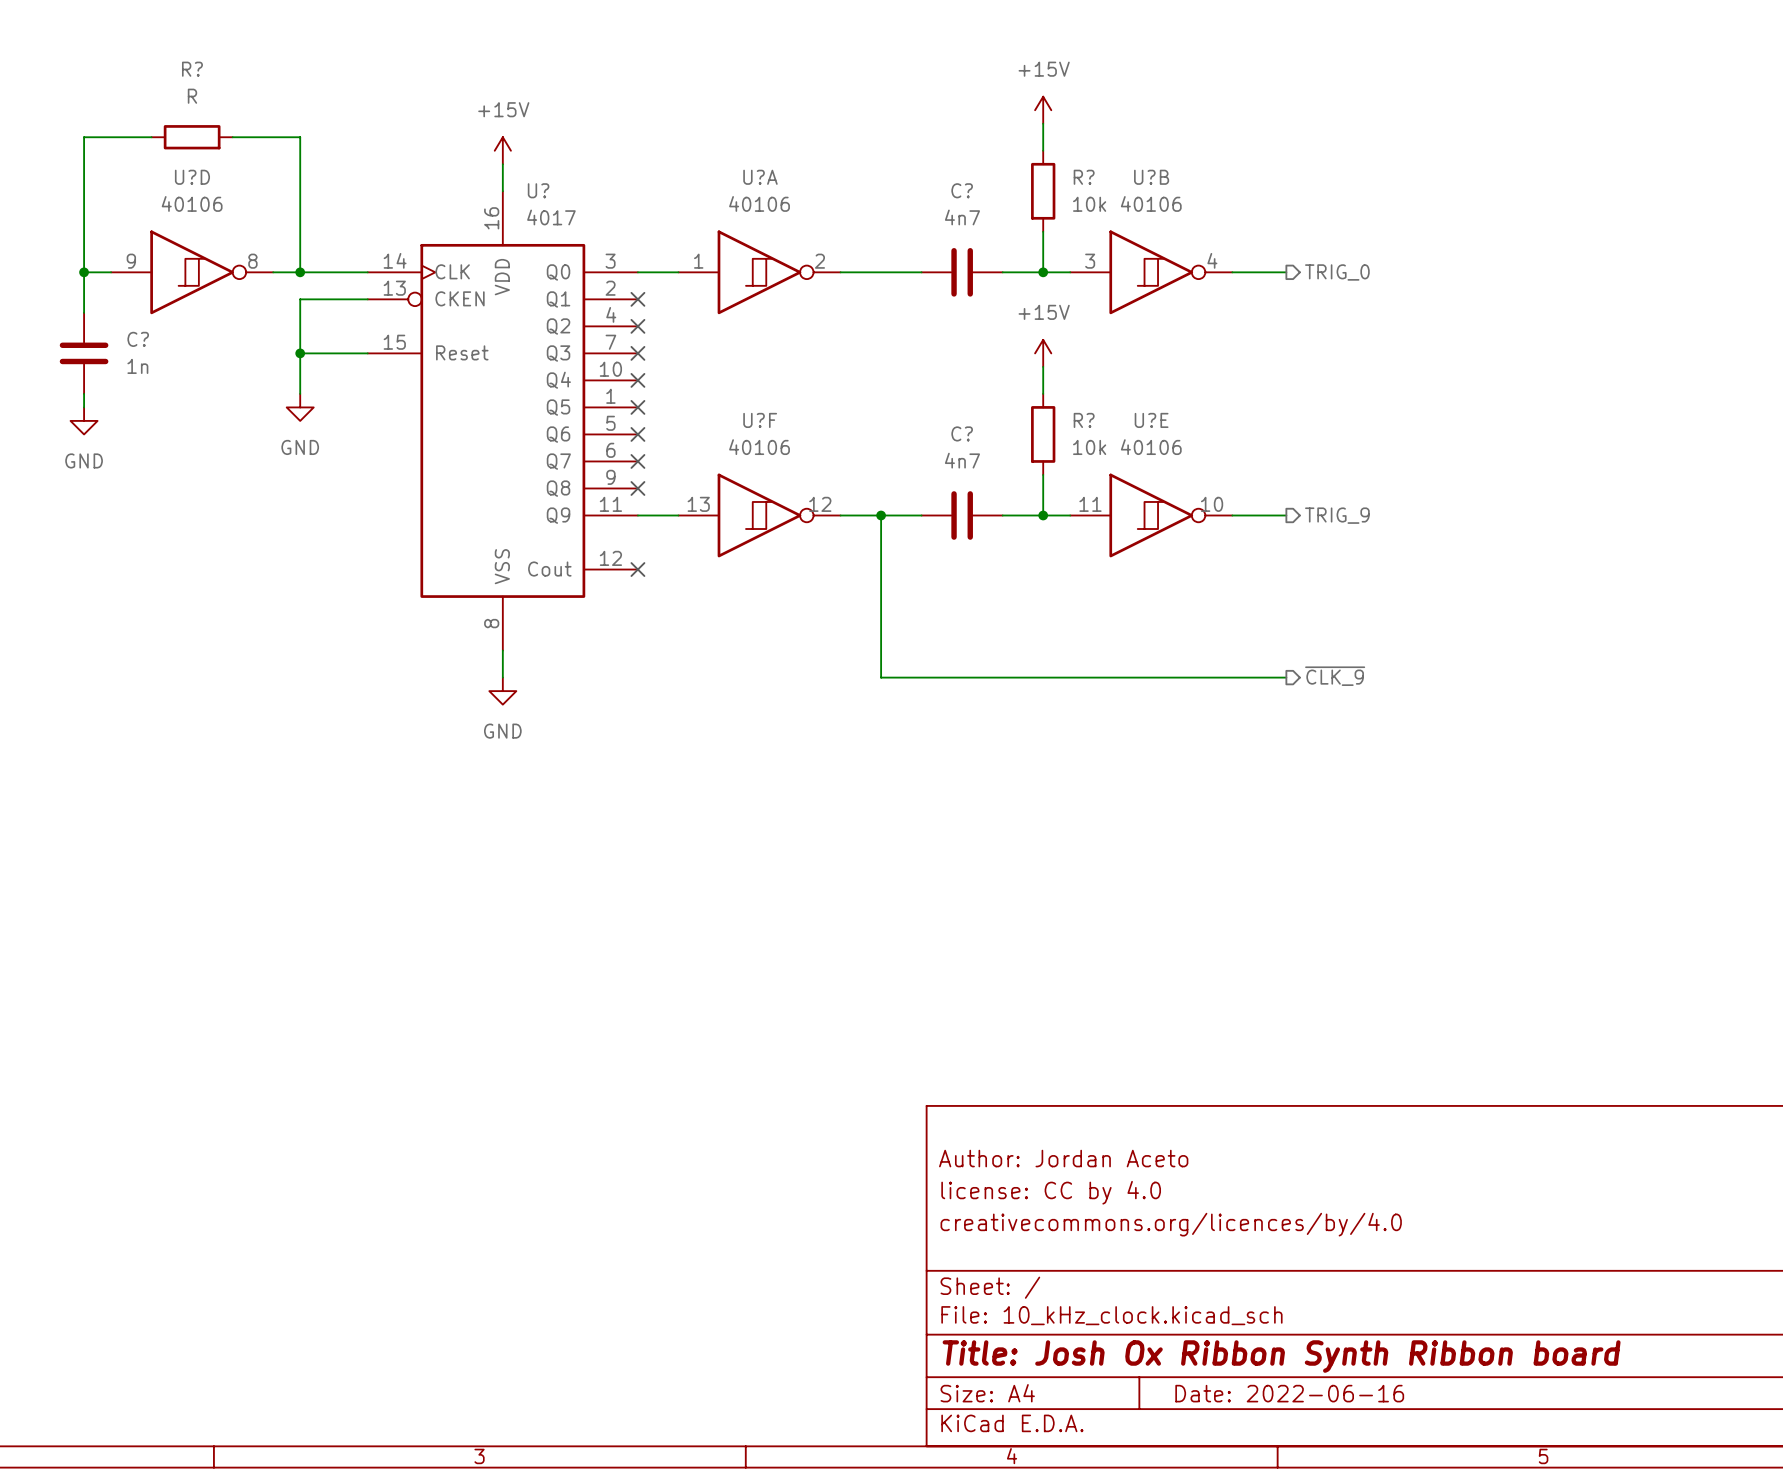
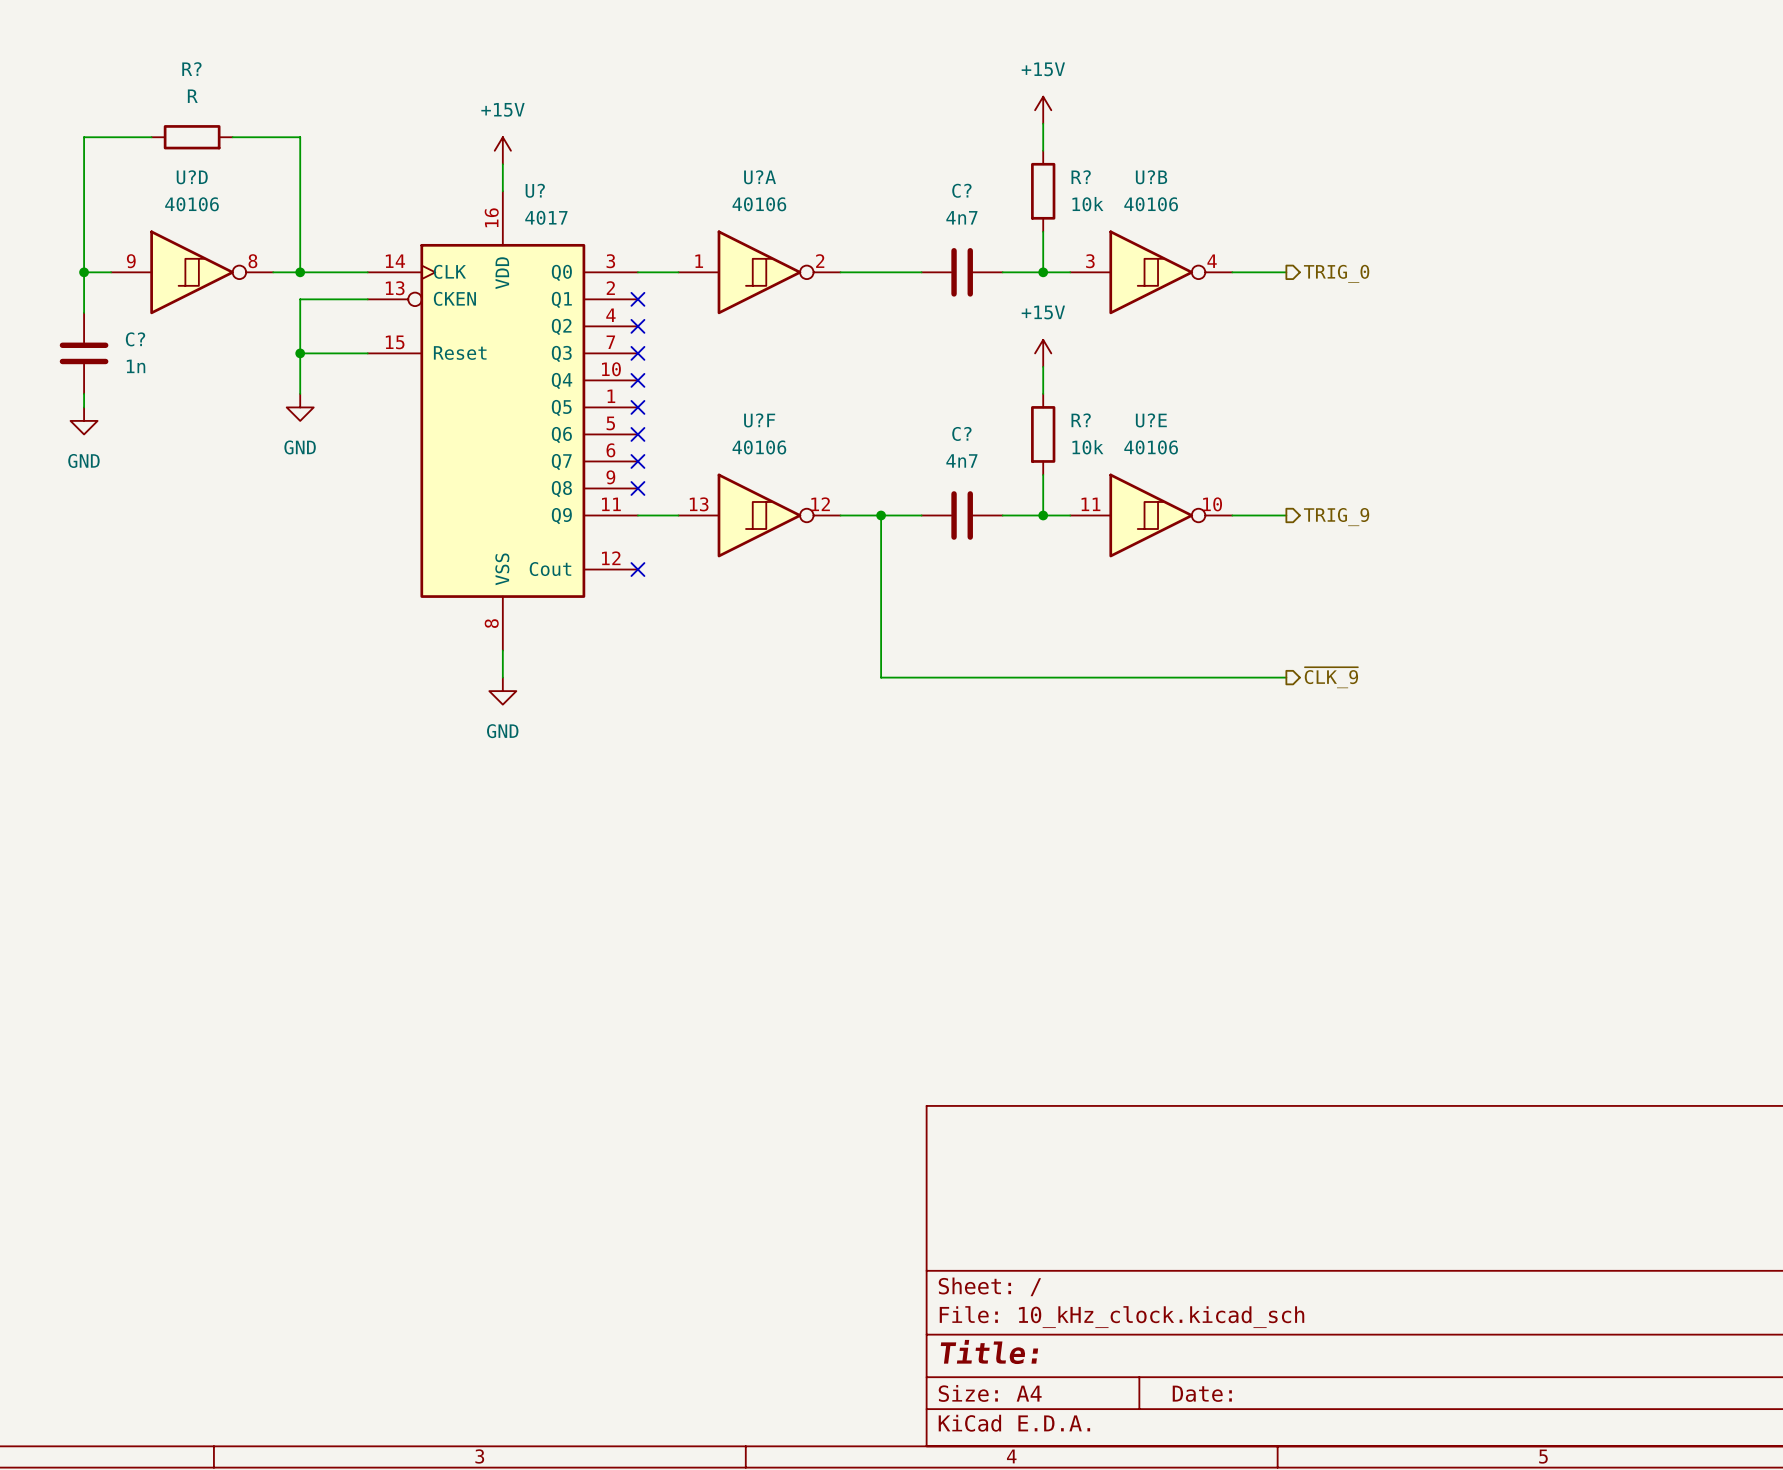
title block: Author: Jordan Aceto (1063, 1158) -> none
title block: license: CC by 4.0 (1051, 1192) -> none
title block: creativecommons.org/licences/by/4.0 (1171, 1224) -> none
title block: Title: Josh Ox Ribbon Synth Ribbon board (1281, 1356) -> Title: (989, 1351)
title block: Date: 2022-06-16 (1289, 1393) -> Date: (1202, 1393)

